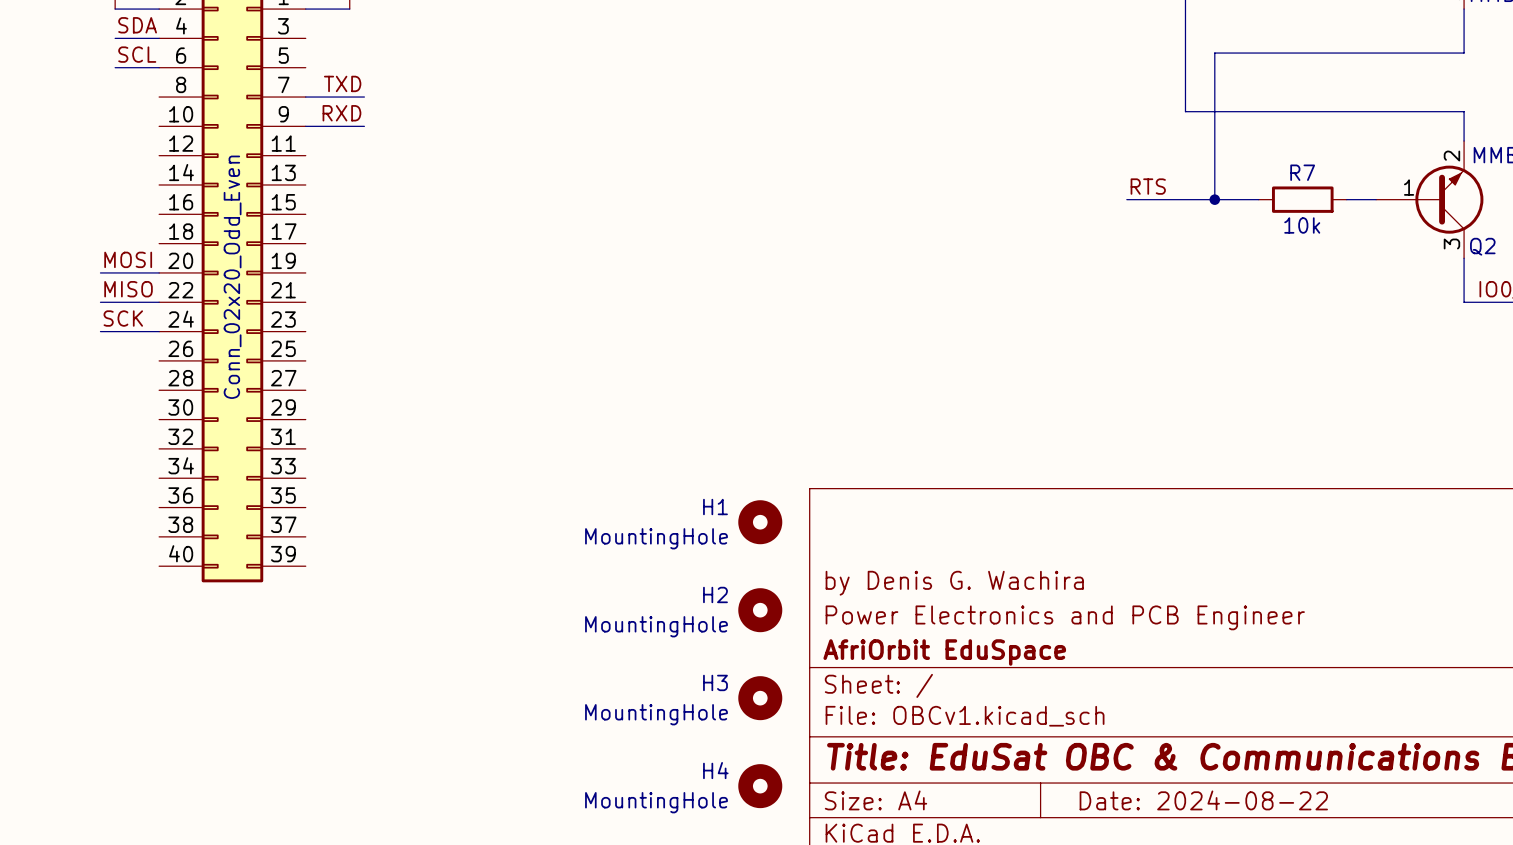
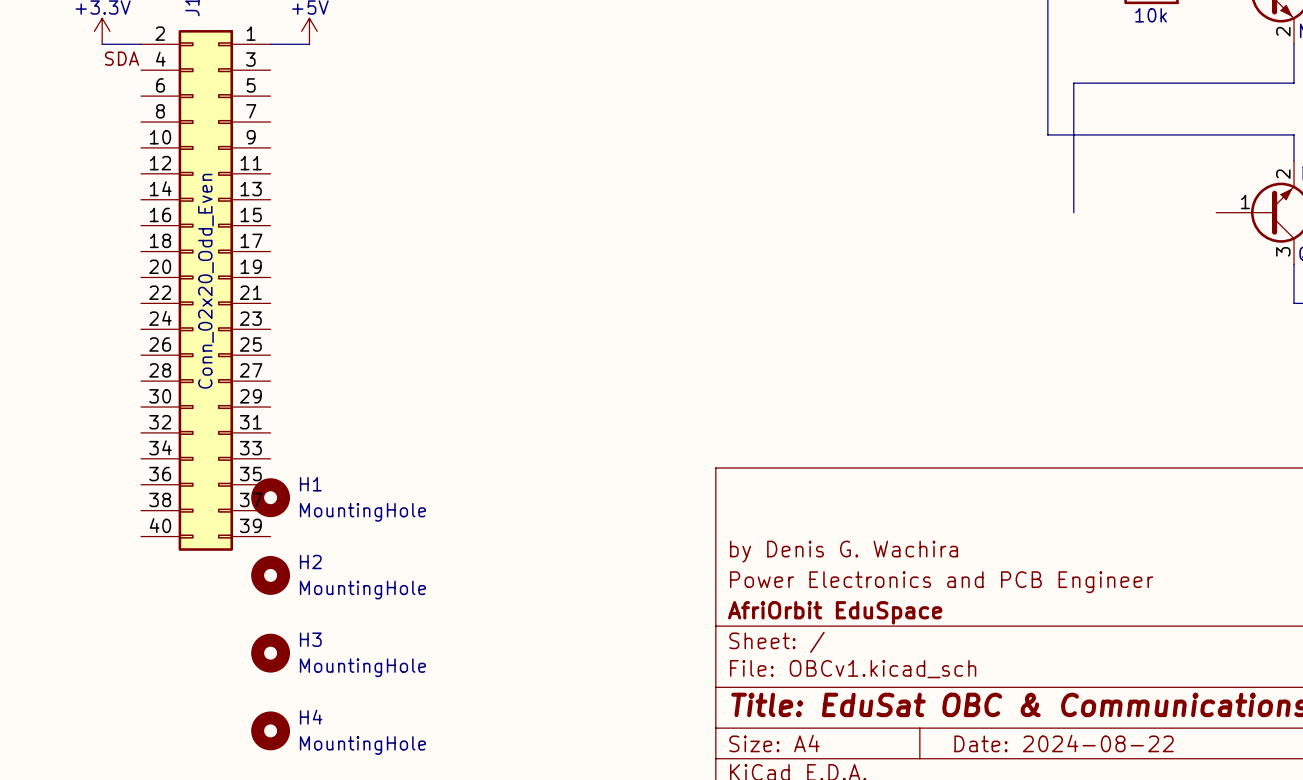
wire: (115, 38) (159, 38) -> none
label: SCL (137, 54) -> none
wire: (115, 67) (159, 67) -> none
label: TXD (342, 83) -> none
wire: (305, 97) (364, 97) -> none
label: RXD (341, 113) -> none
wire: (305, 126) (364, 126) -> none
label: RTS (1148, 186) -> none
wire: (1126, 199) (1258, 199) -> none
junction: (1214, 199) -> none
R7: 10k (1302, 199) -> none
wire: (1346, 199) (1376, 199) -> none
label: MOSI (128, 259) -> none
wire: (100, 272) (159, 272) -> none
label: MISO (128, 289) -> none
wire: (100, 302) (159, 302) -> none
label: SCK (123, 318) -> none
wire: (100, 331) (159, 331) -> none
H1 name position: H1 (715, 507) -> H1 (310, 484)
H1 position: (760, 522) -> (270, 497)
H1 value position: MountingHole (656, 538) -> MountingHole (362, 512)
H2 name position: H2 (715, 594) -> H2 (310, 561)
H2 position: (760, 610) -> (270, 575)
H2 value position: MountingHole (656, 626) -> MountingHole (362, 590)
H3 name position: H3 (715, 682) -> H3 (310, 639)
H3 position: (760, 698) -> (270, 653)
H3 value position: MountingHole (656, 714) -> MountingHole (362, 667)
H4 name position: H4 (715, 770) -> H4 (311, 717)
H4 position: (760, 786) -> (270, 730)
H4 value position: MountingHole (656, 802) -> MountingHole (362, 745)

